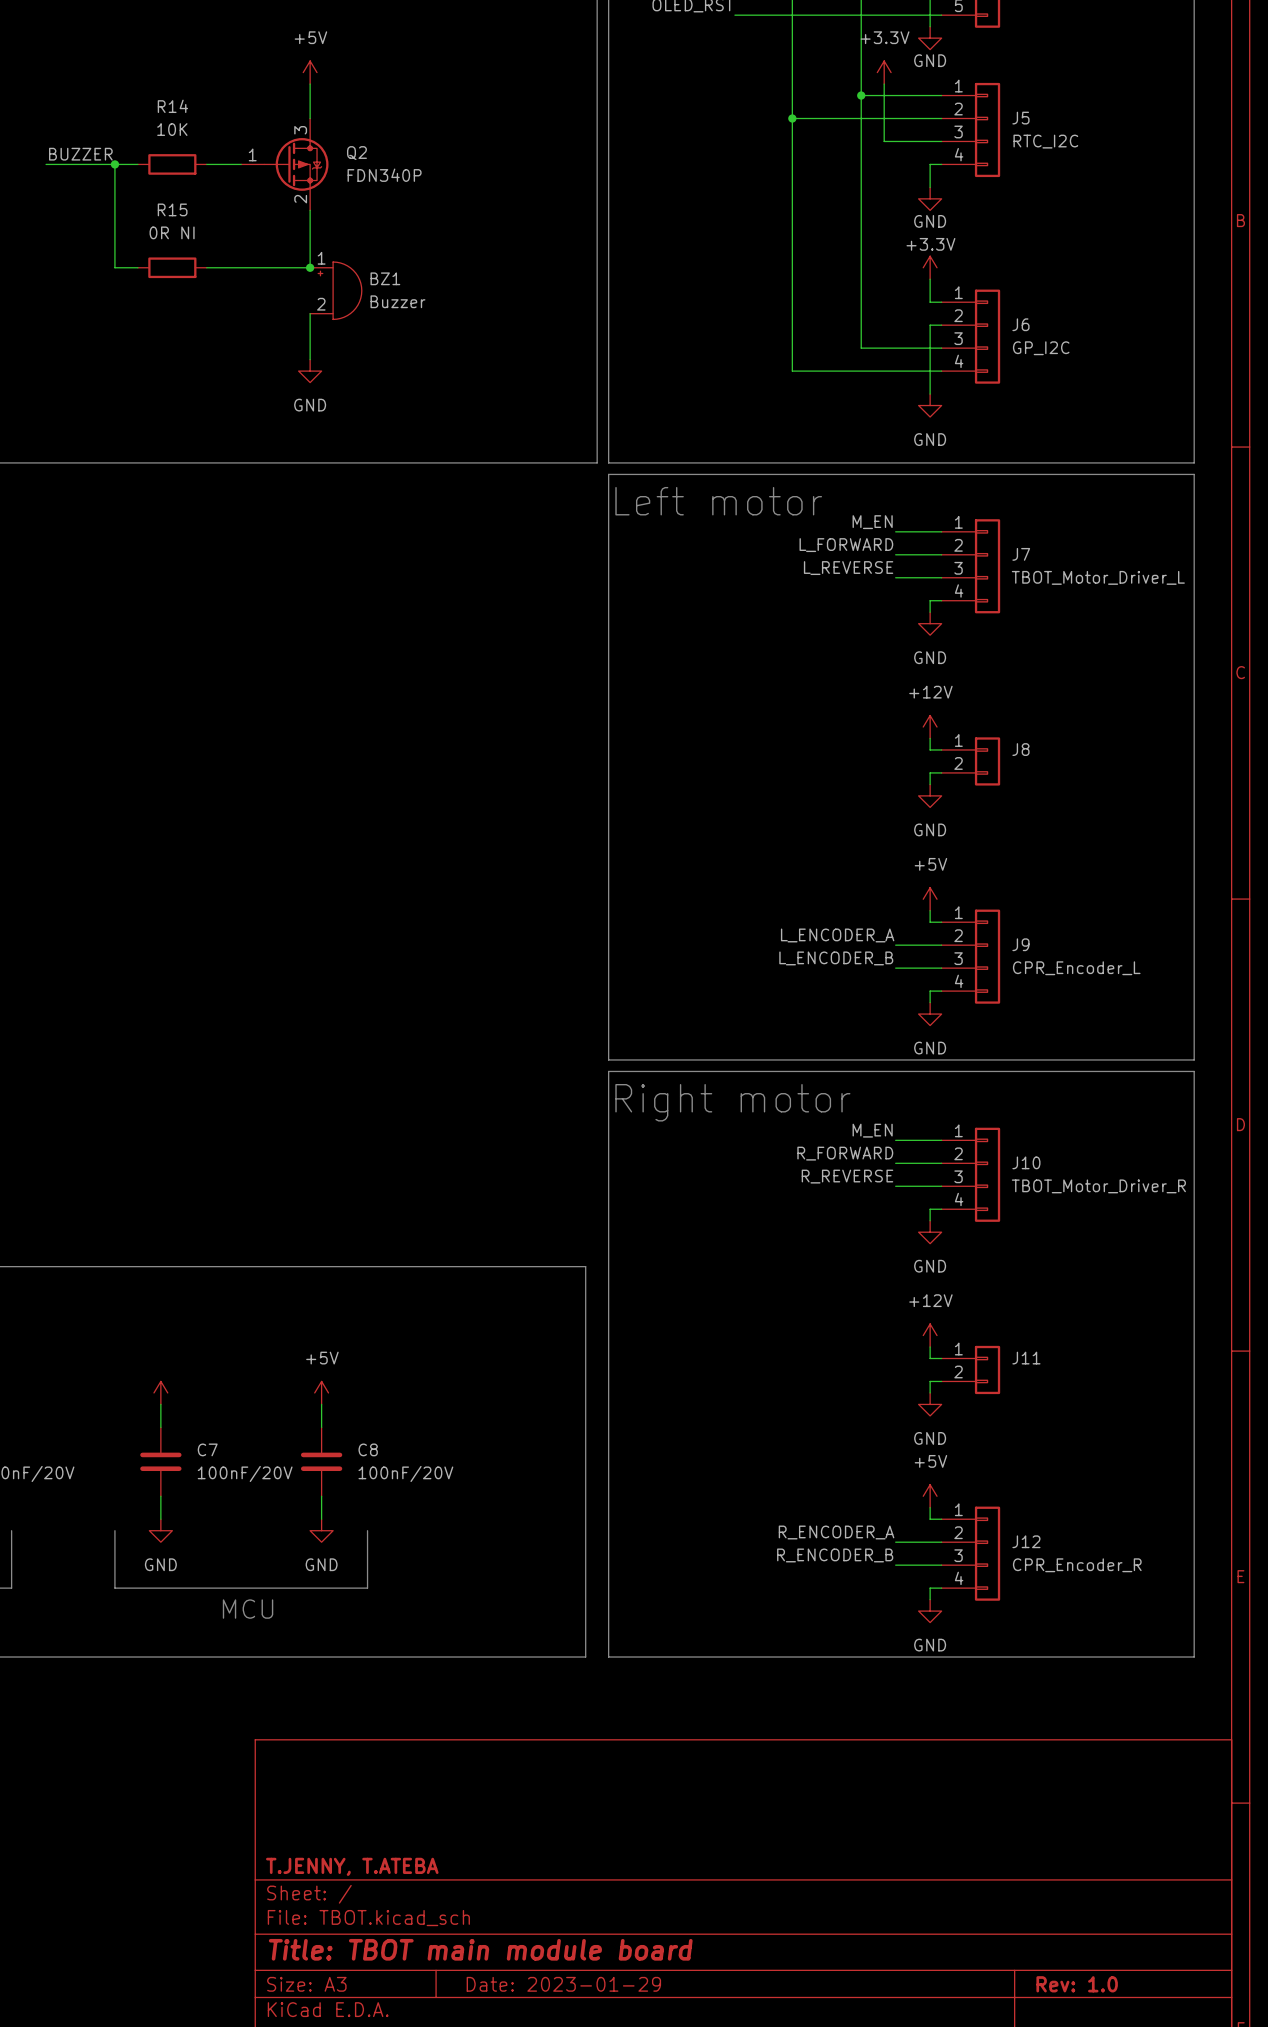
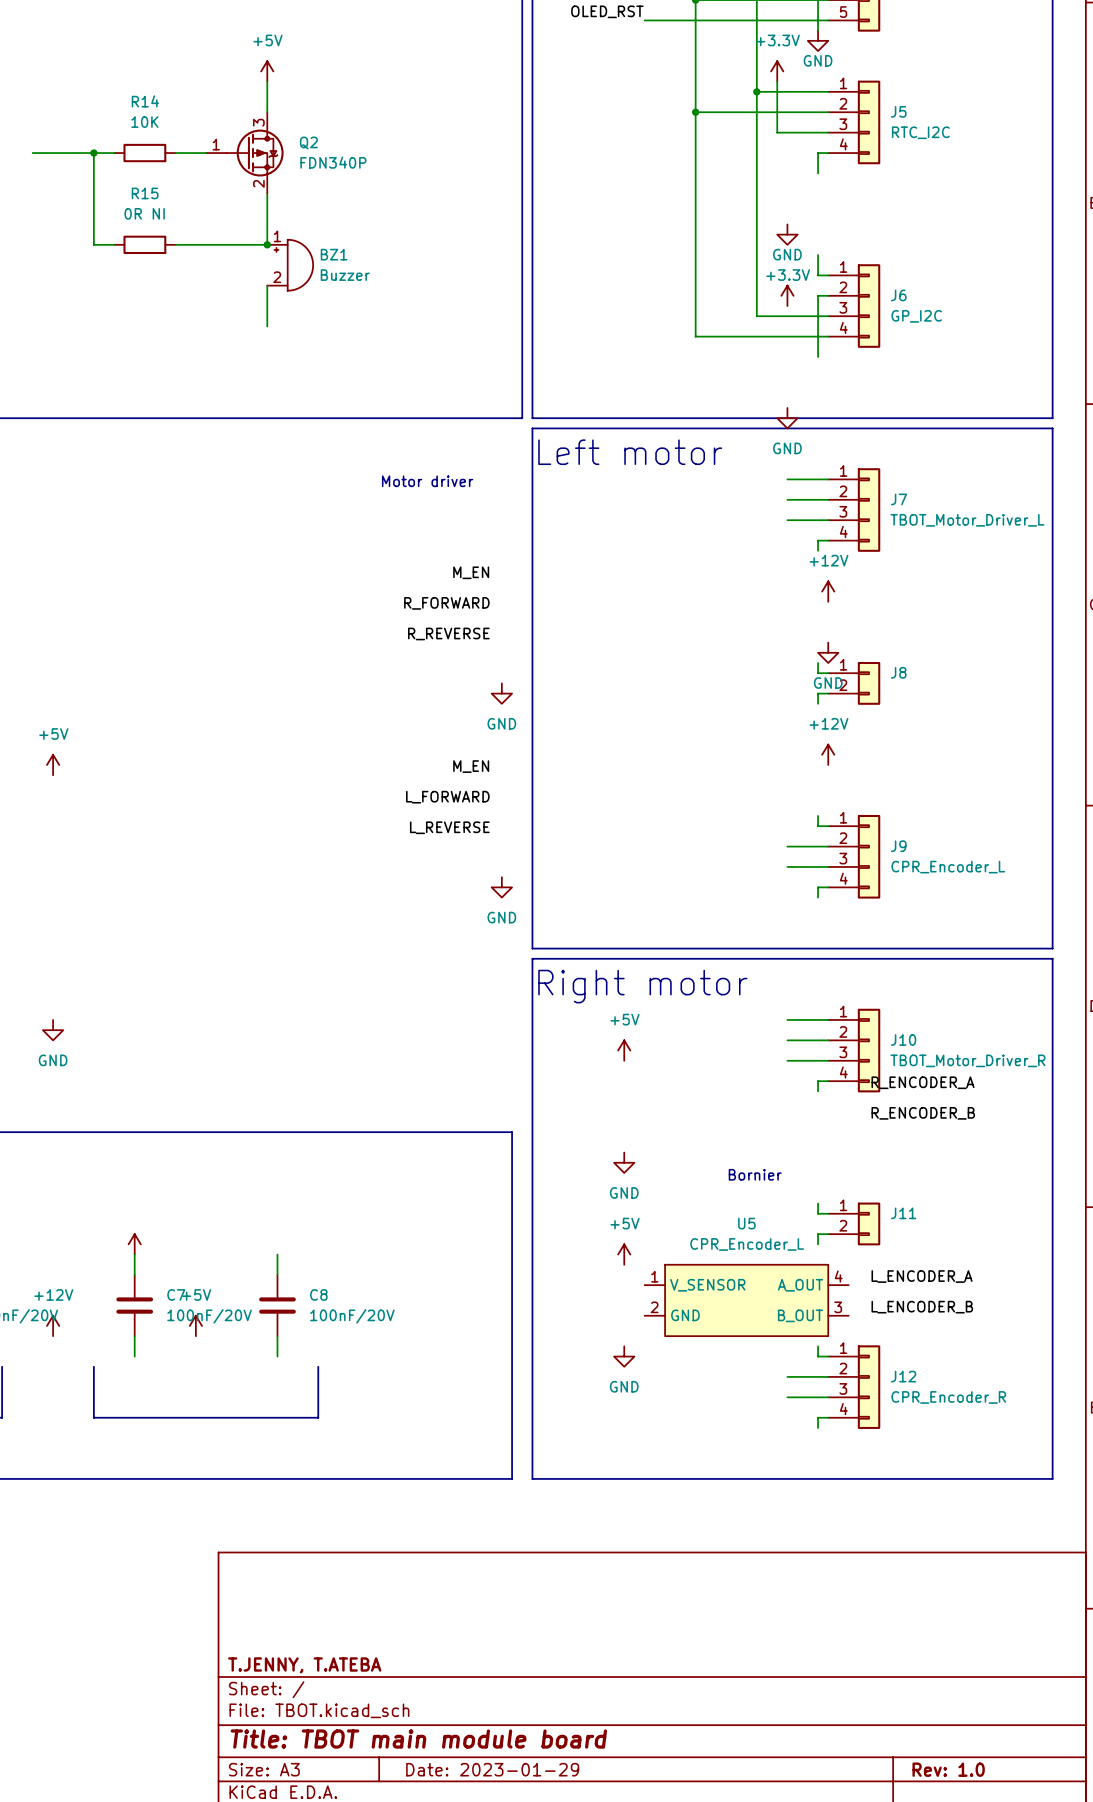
label: BUZZER (80, 154) -> none
power symbol position: GND (930, 198) -> GND (787, 234)
power symbol position: +3.3V (930, 267) -> +3.3V (787, 295)
power symbol: GND (310, 371) -> none
power symbol position: GND (930, 405) -> GND (787, 418)
label: M_EN (872, 522) -> none
text: none -> Motor driver (427, 481)
label: L_FORWARD (846, 545) -> none
label: L_REVERSE (848, 568) -> none
power symbol: GND (930, 623) -> none
label: none -> M_EN (471, 572)
power symbol: none -> +12V (828, 591)
label: none -> R_FORWARD (446, 603)
label: none -> R_REVERSE (448, 633)
power symbol: +12V (930, 727) -> none
power symbol: none -> GND (828, 652)
power symbol: none -> GND (501, 693)
power symbol: GND (930, 795) -> none
power symbol: none -> +12V (828, 754)
power symbol: none -> +5V (53, 764)
label: none -> M_EN (471, 766)
label: none -> L_FORWARD (447, 797)
power symbol: +5V (930, 899) -> none
label: none -> L_REVERSE (449, 827)
label: L_ENCODER_A (837, 935) -> none
label: L_ENCODER_B (836, 958) -> none
power symbol: none -> GND (501, 887)
power symbol: GND (930, 1014) -> none
label: M_EN (872, 1130) -> none
power symbol: none -> GND (53, 1030)
label: R_FORWARD (845, 1153) -> none
power symbol: none -> +5V (624, 1050)
label: R_REVERSE (847, 1176) -> none
label: none -> R_ENCODER_A (923, 1082)
power symbol: GND (930, 1232) -> none
label: none -> R_ENCODER_B (923, 1113)
power symbol: none -> GND (624, 1162)
text: none -> Bornier (755, 1174)
power symbol: +12V (930, 1335) -> none
power symbol position: +5V (321, 1392) -> +5V (195, 1325)
power symbol: none -> +5V (624, 1254)
power symbol: GND (930, 1404) -> none
label: none -> L_ENCODER_A (922, 1276)
U5: none -> CPR_Encoder_L (746, 1300)
label: none -> L_ENCODER_B (922, 1307)
power symbol: none -> +12V (53, 1325)
power symbol: +5V (930, 1496) -> none
power symbol: none -> GND (624, 1356)
power symbol: GND (160, 1530) -> none
power symbol: GND (321, 1530) -> none
label: R_ENCODER_A (836, 1532) -> none
label: R_ENCODER_B (835, 1555) -> none
text: MCU (248, 1609) -> none
power symbol: GND (930, 1611) -> none

